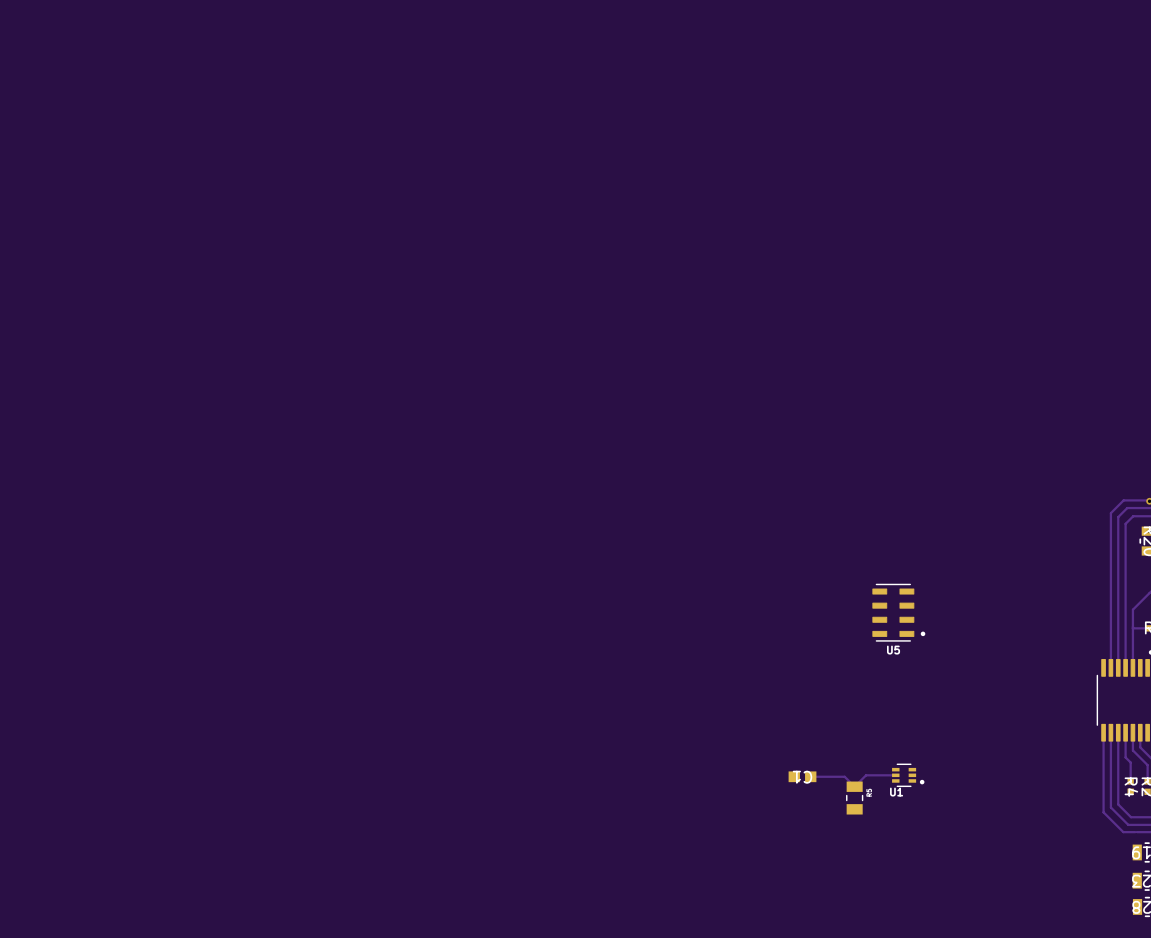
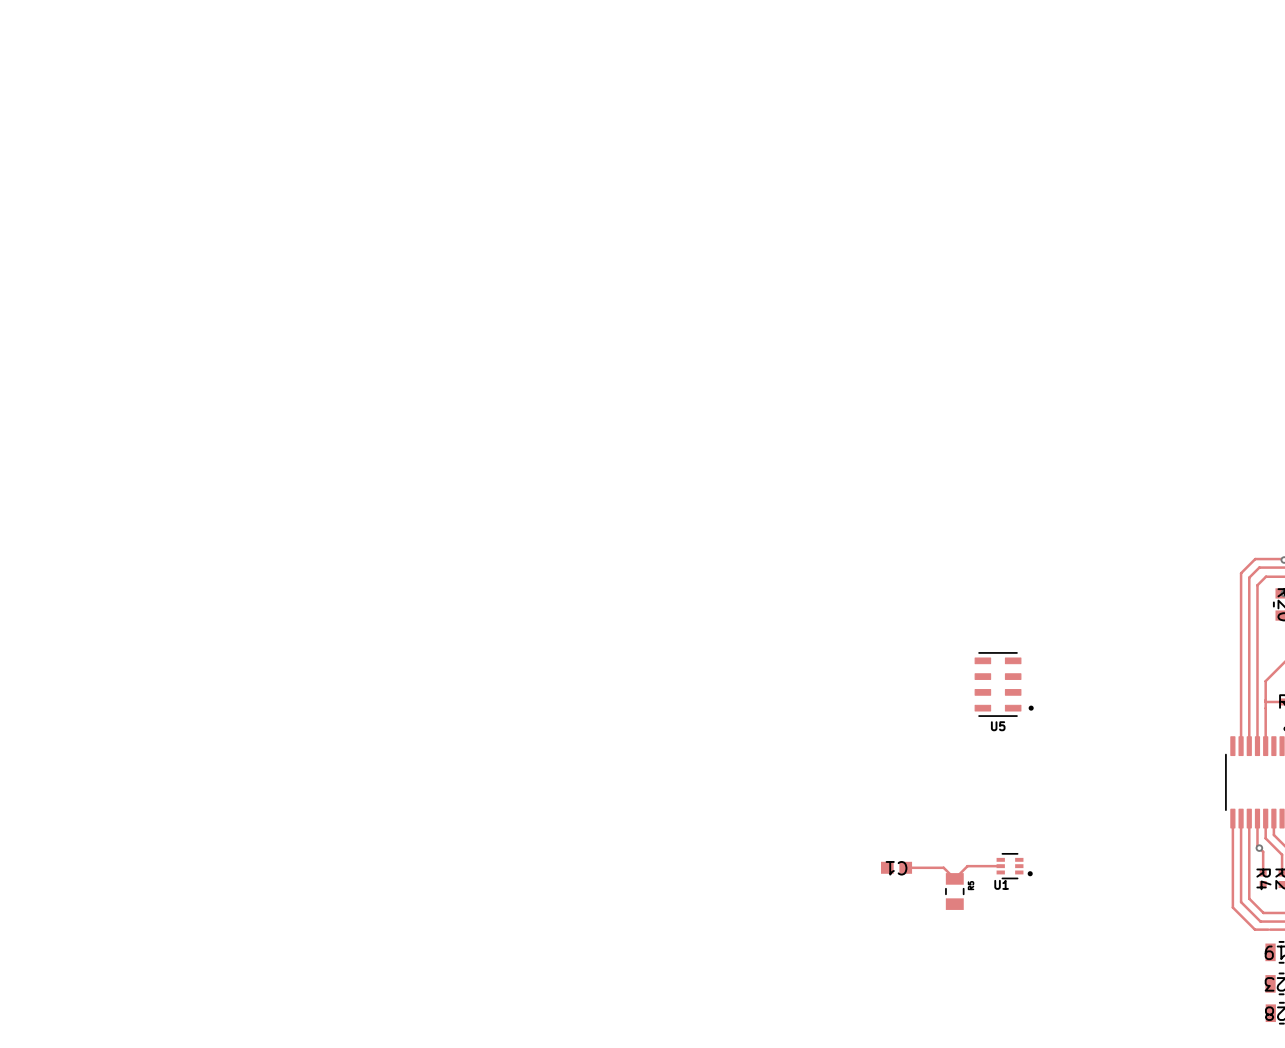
via: none -> (1259, 848)

